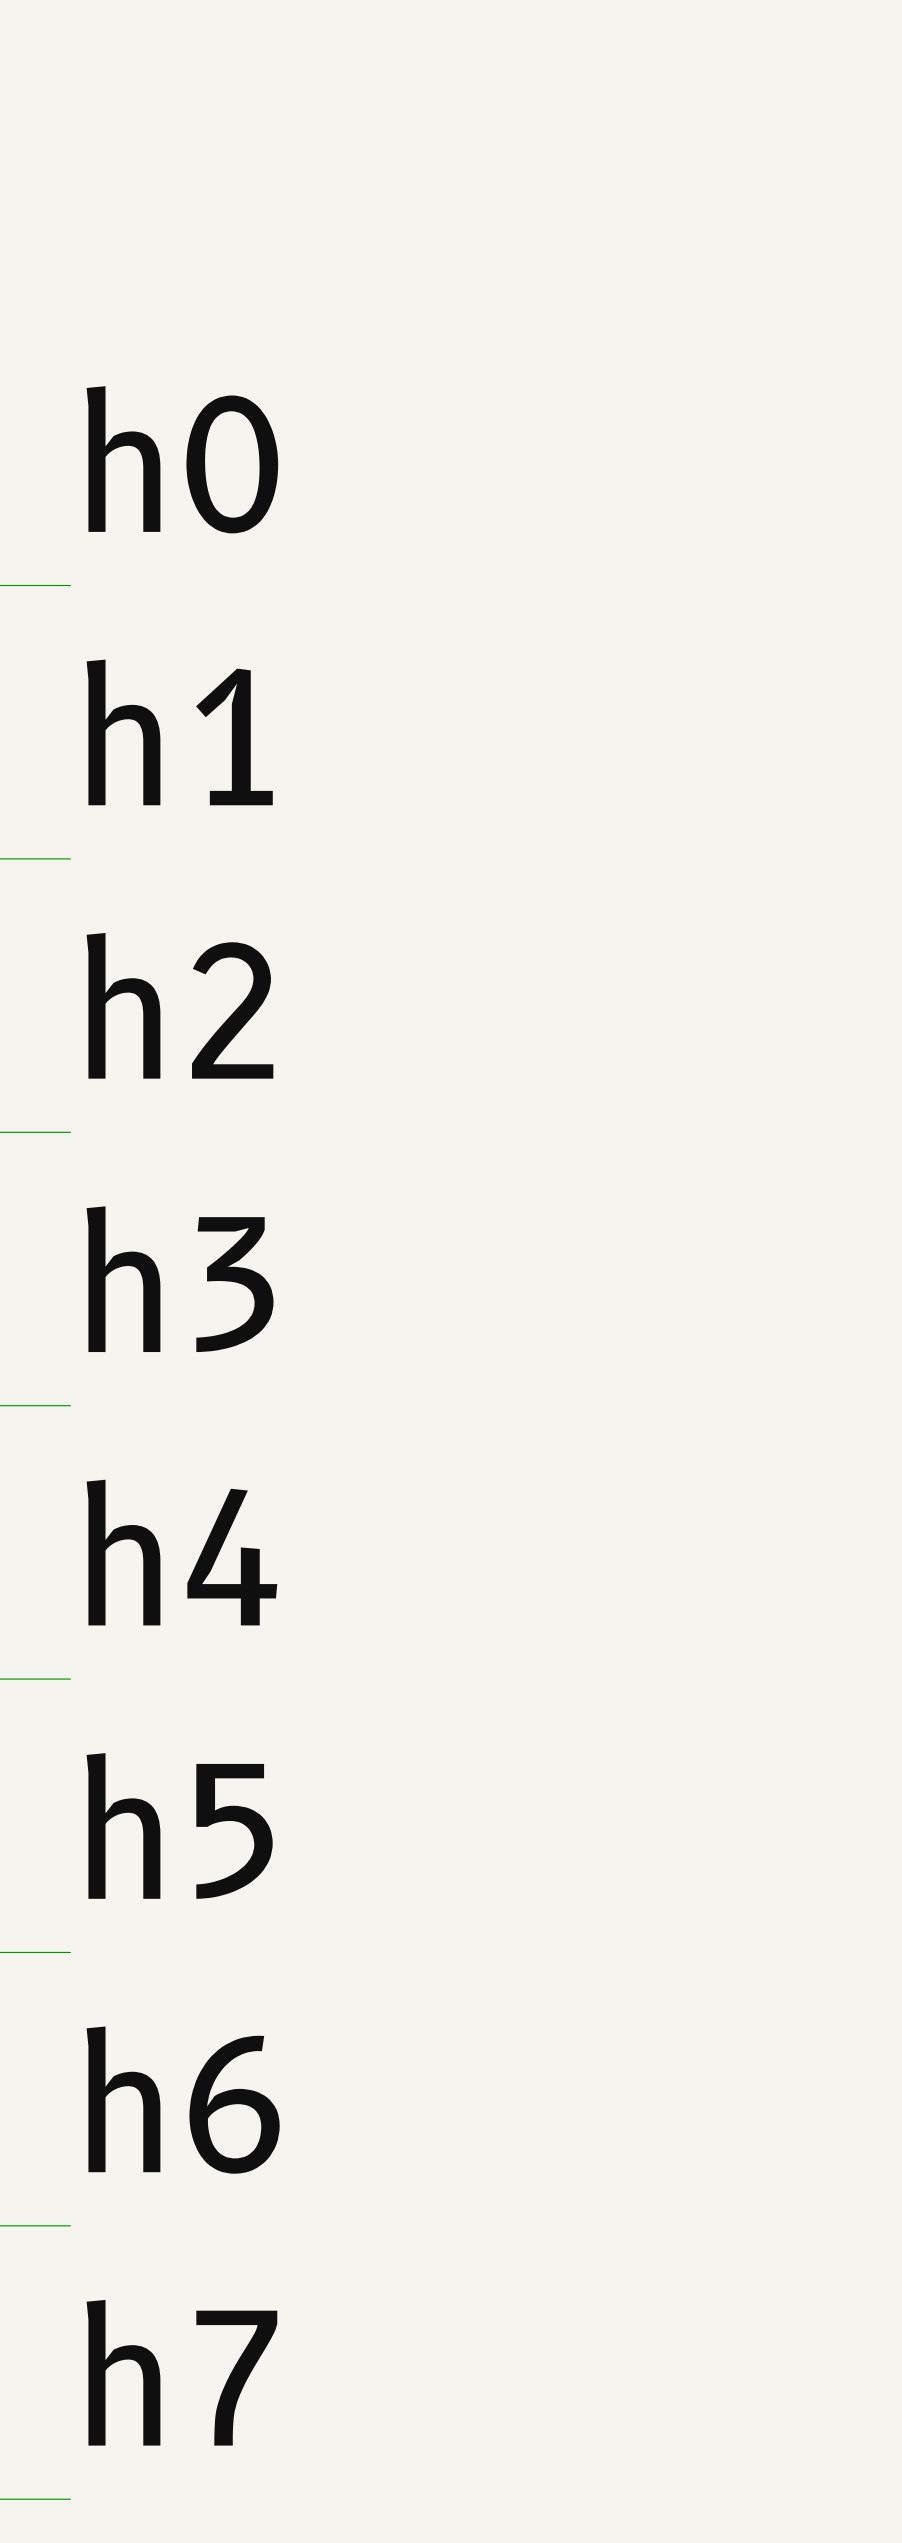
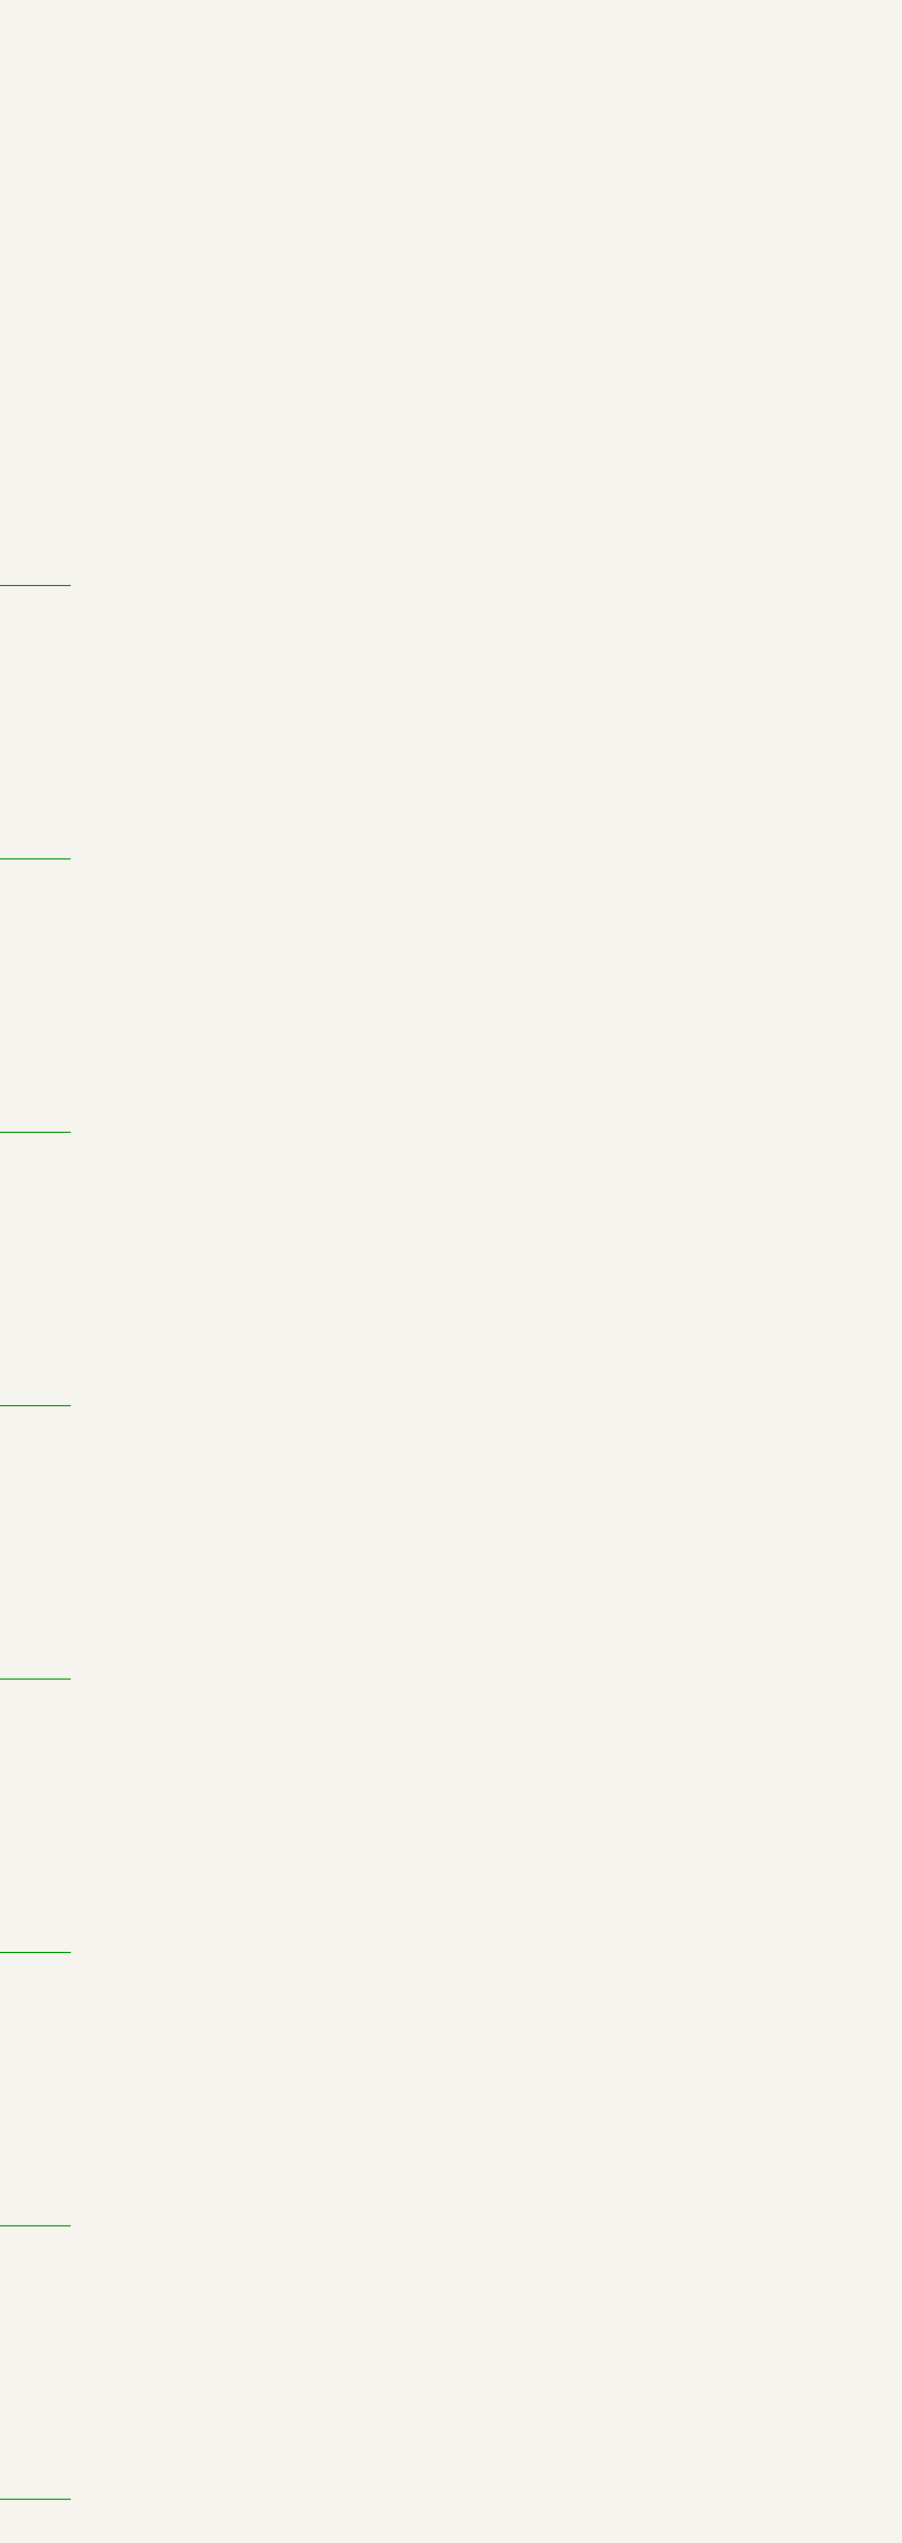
label: h0 (182, 459) -> none
label: h1 (179, 732) -> none
label: h2 (179, 1005) -> none
label: h3 (180, 1279) -> none
label: h4 (181, 1552) -> none
label: h5 (179, 1825) -> none
label: h6 (183, 2100) -> none
label: h7 (181, 2372) -> none

